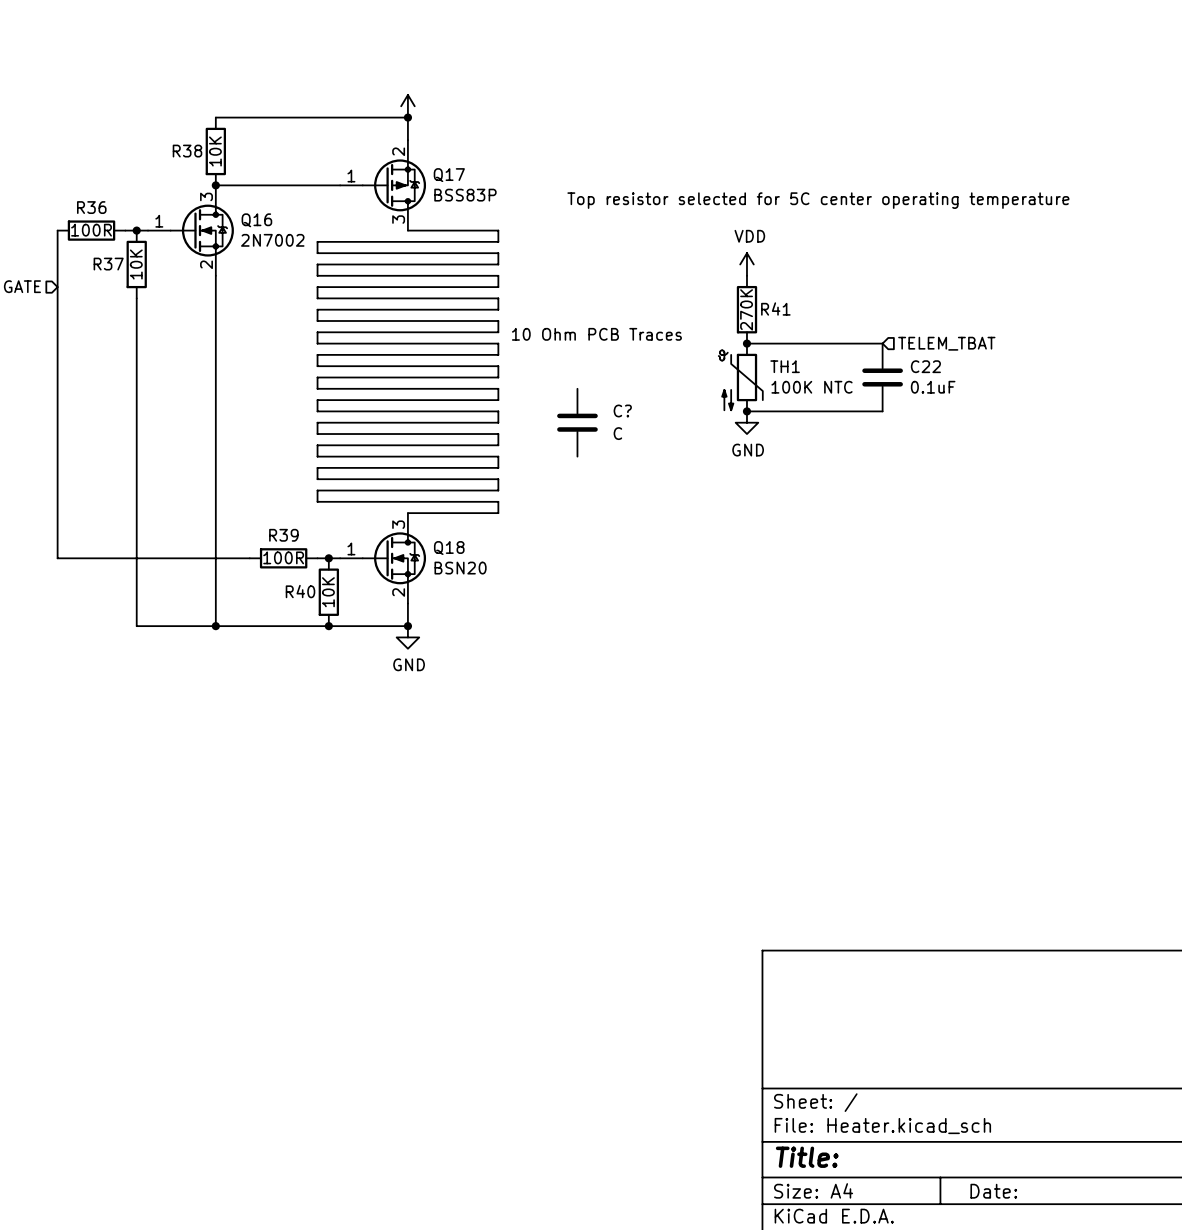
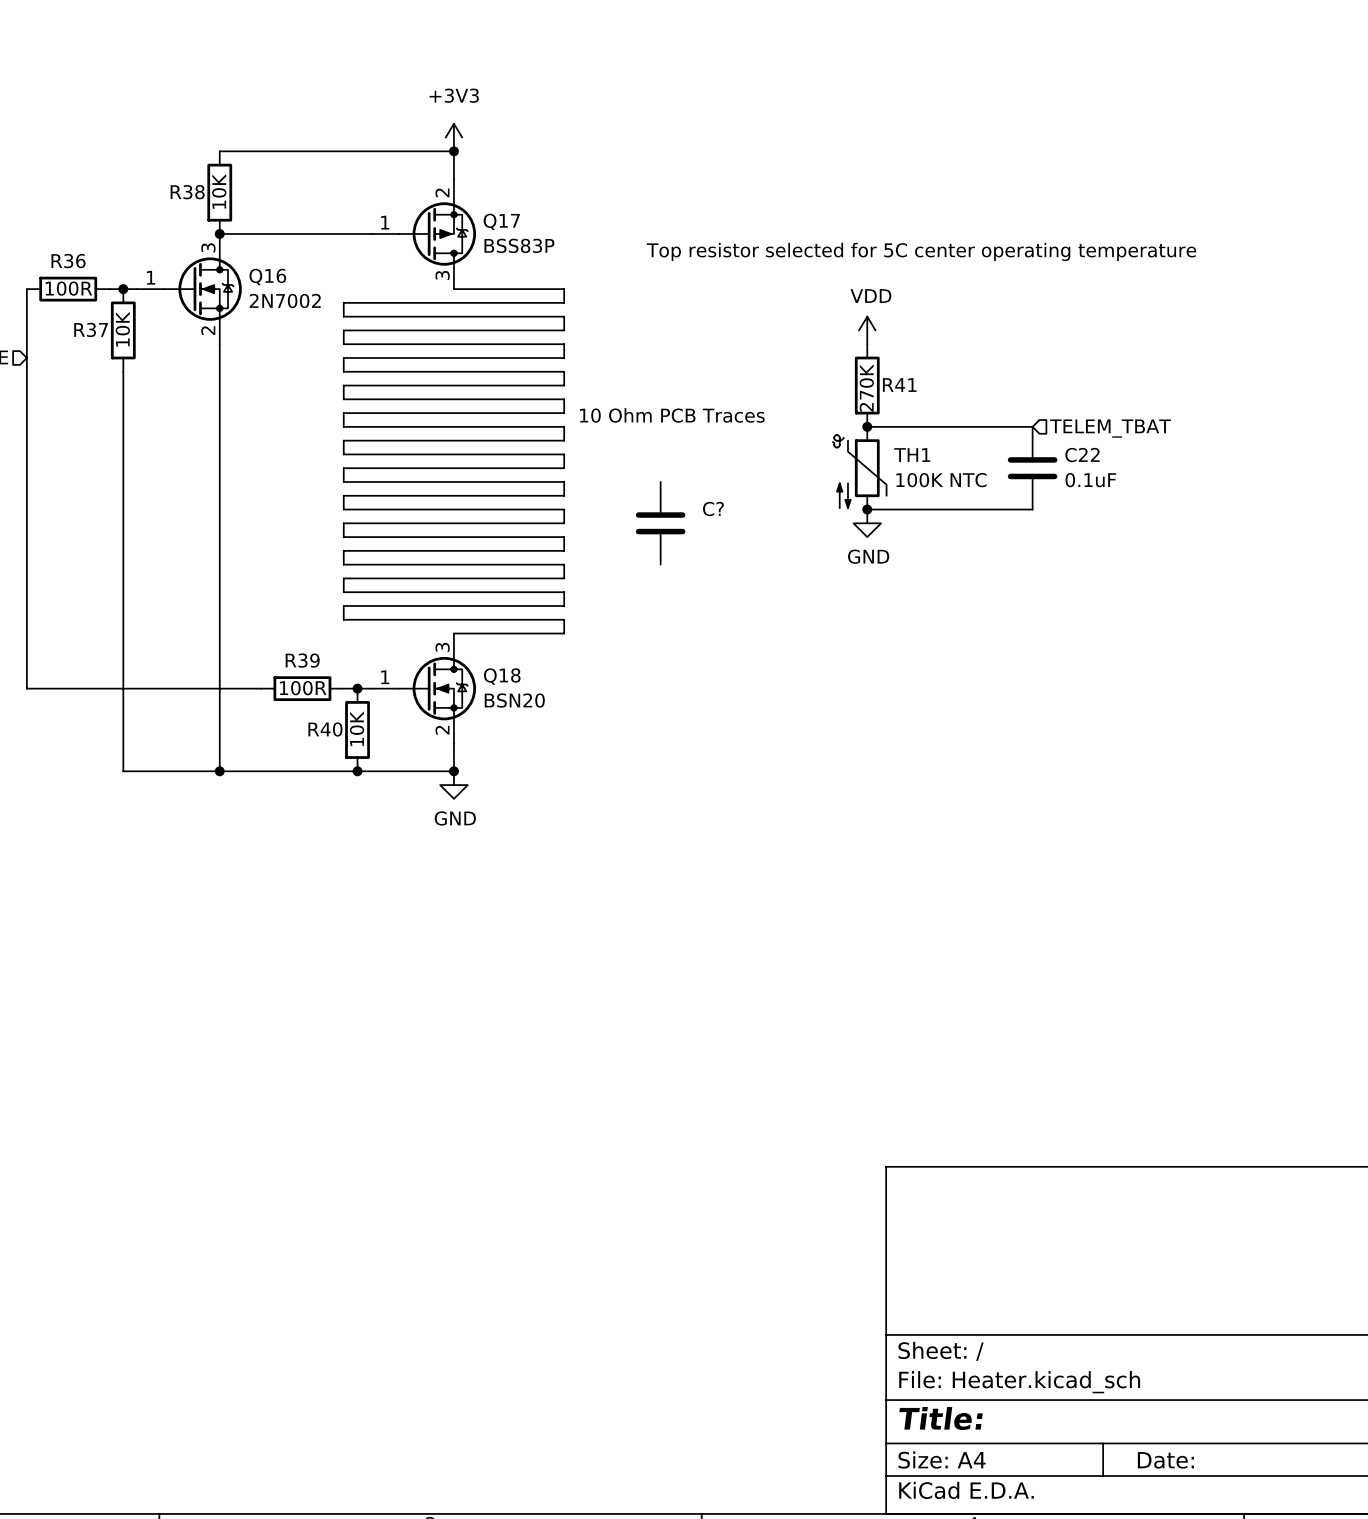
power symbol text: none -> +3V3 (454, 95)
C? value: C (617, 433) -> none

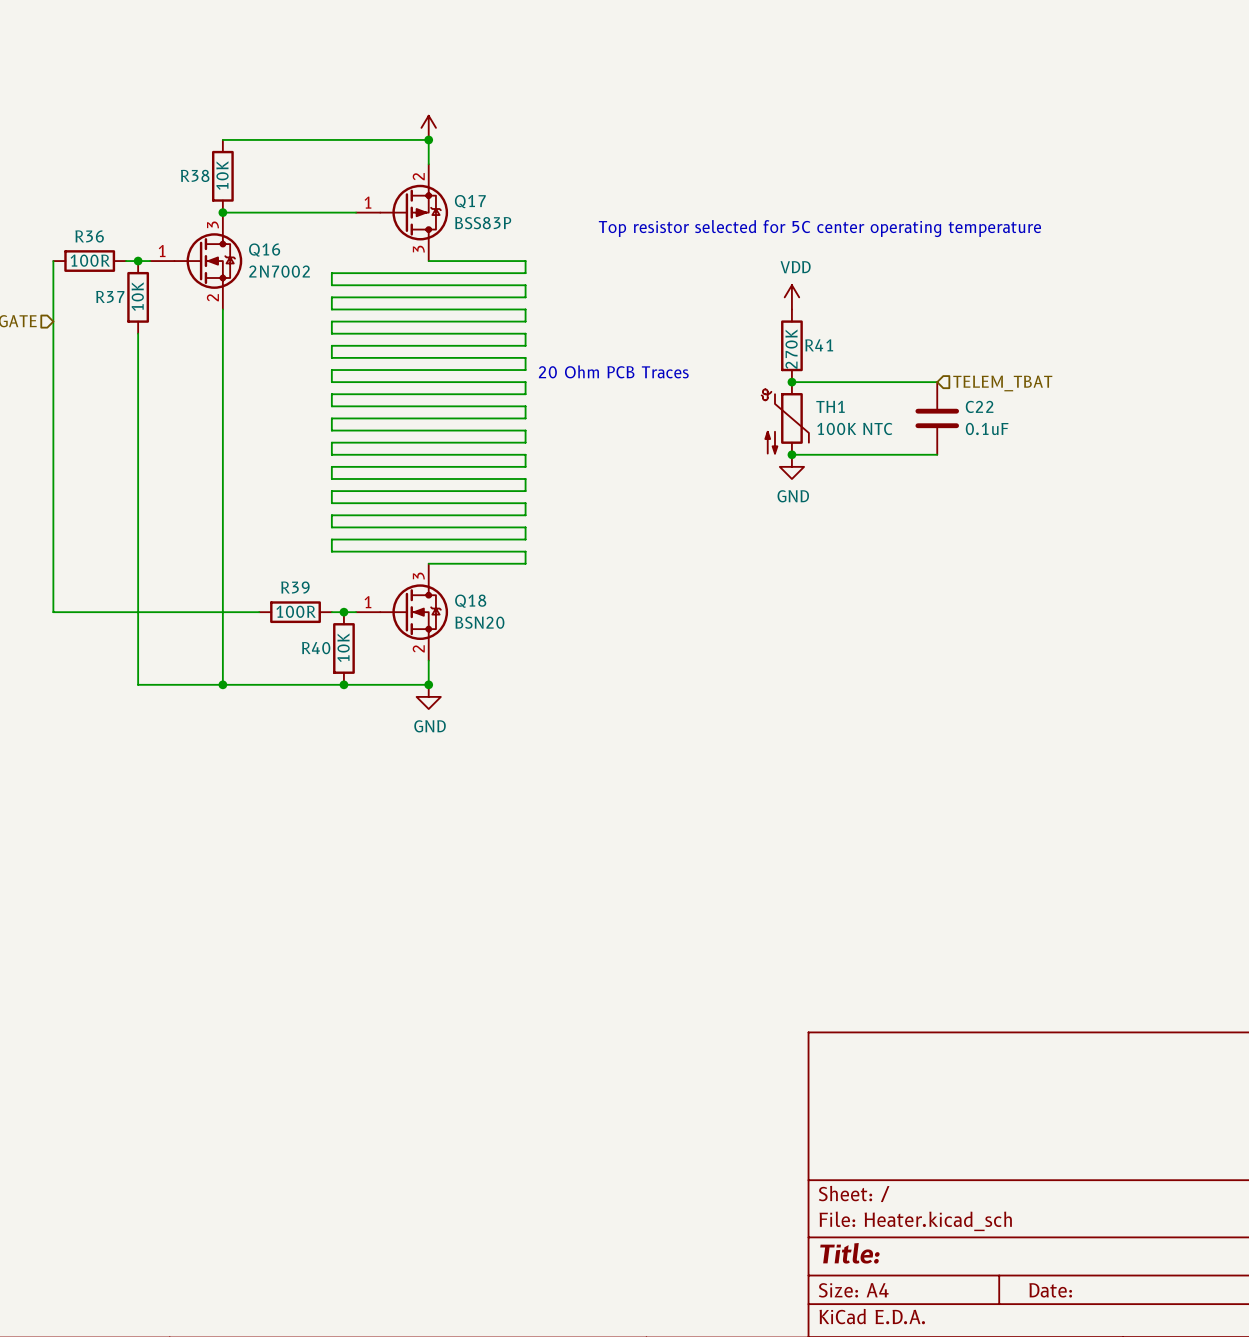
power symbol text: +3V3 (454, 95) -> none
text: 10 Ohm PCB Traces (672, 415) -> 20 Ohm PCB Traces (613, 371)
C?: (660, 523) -> none

